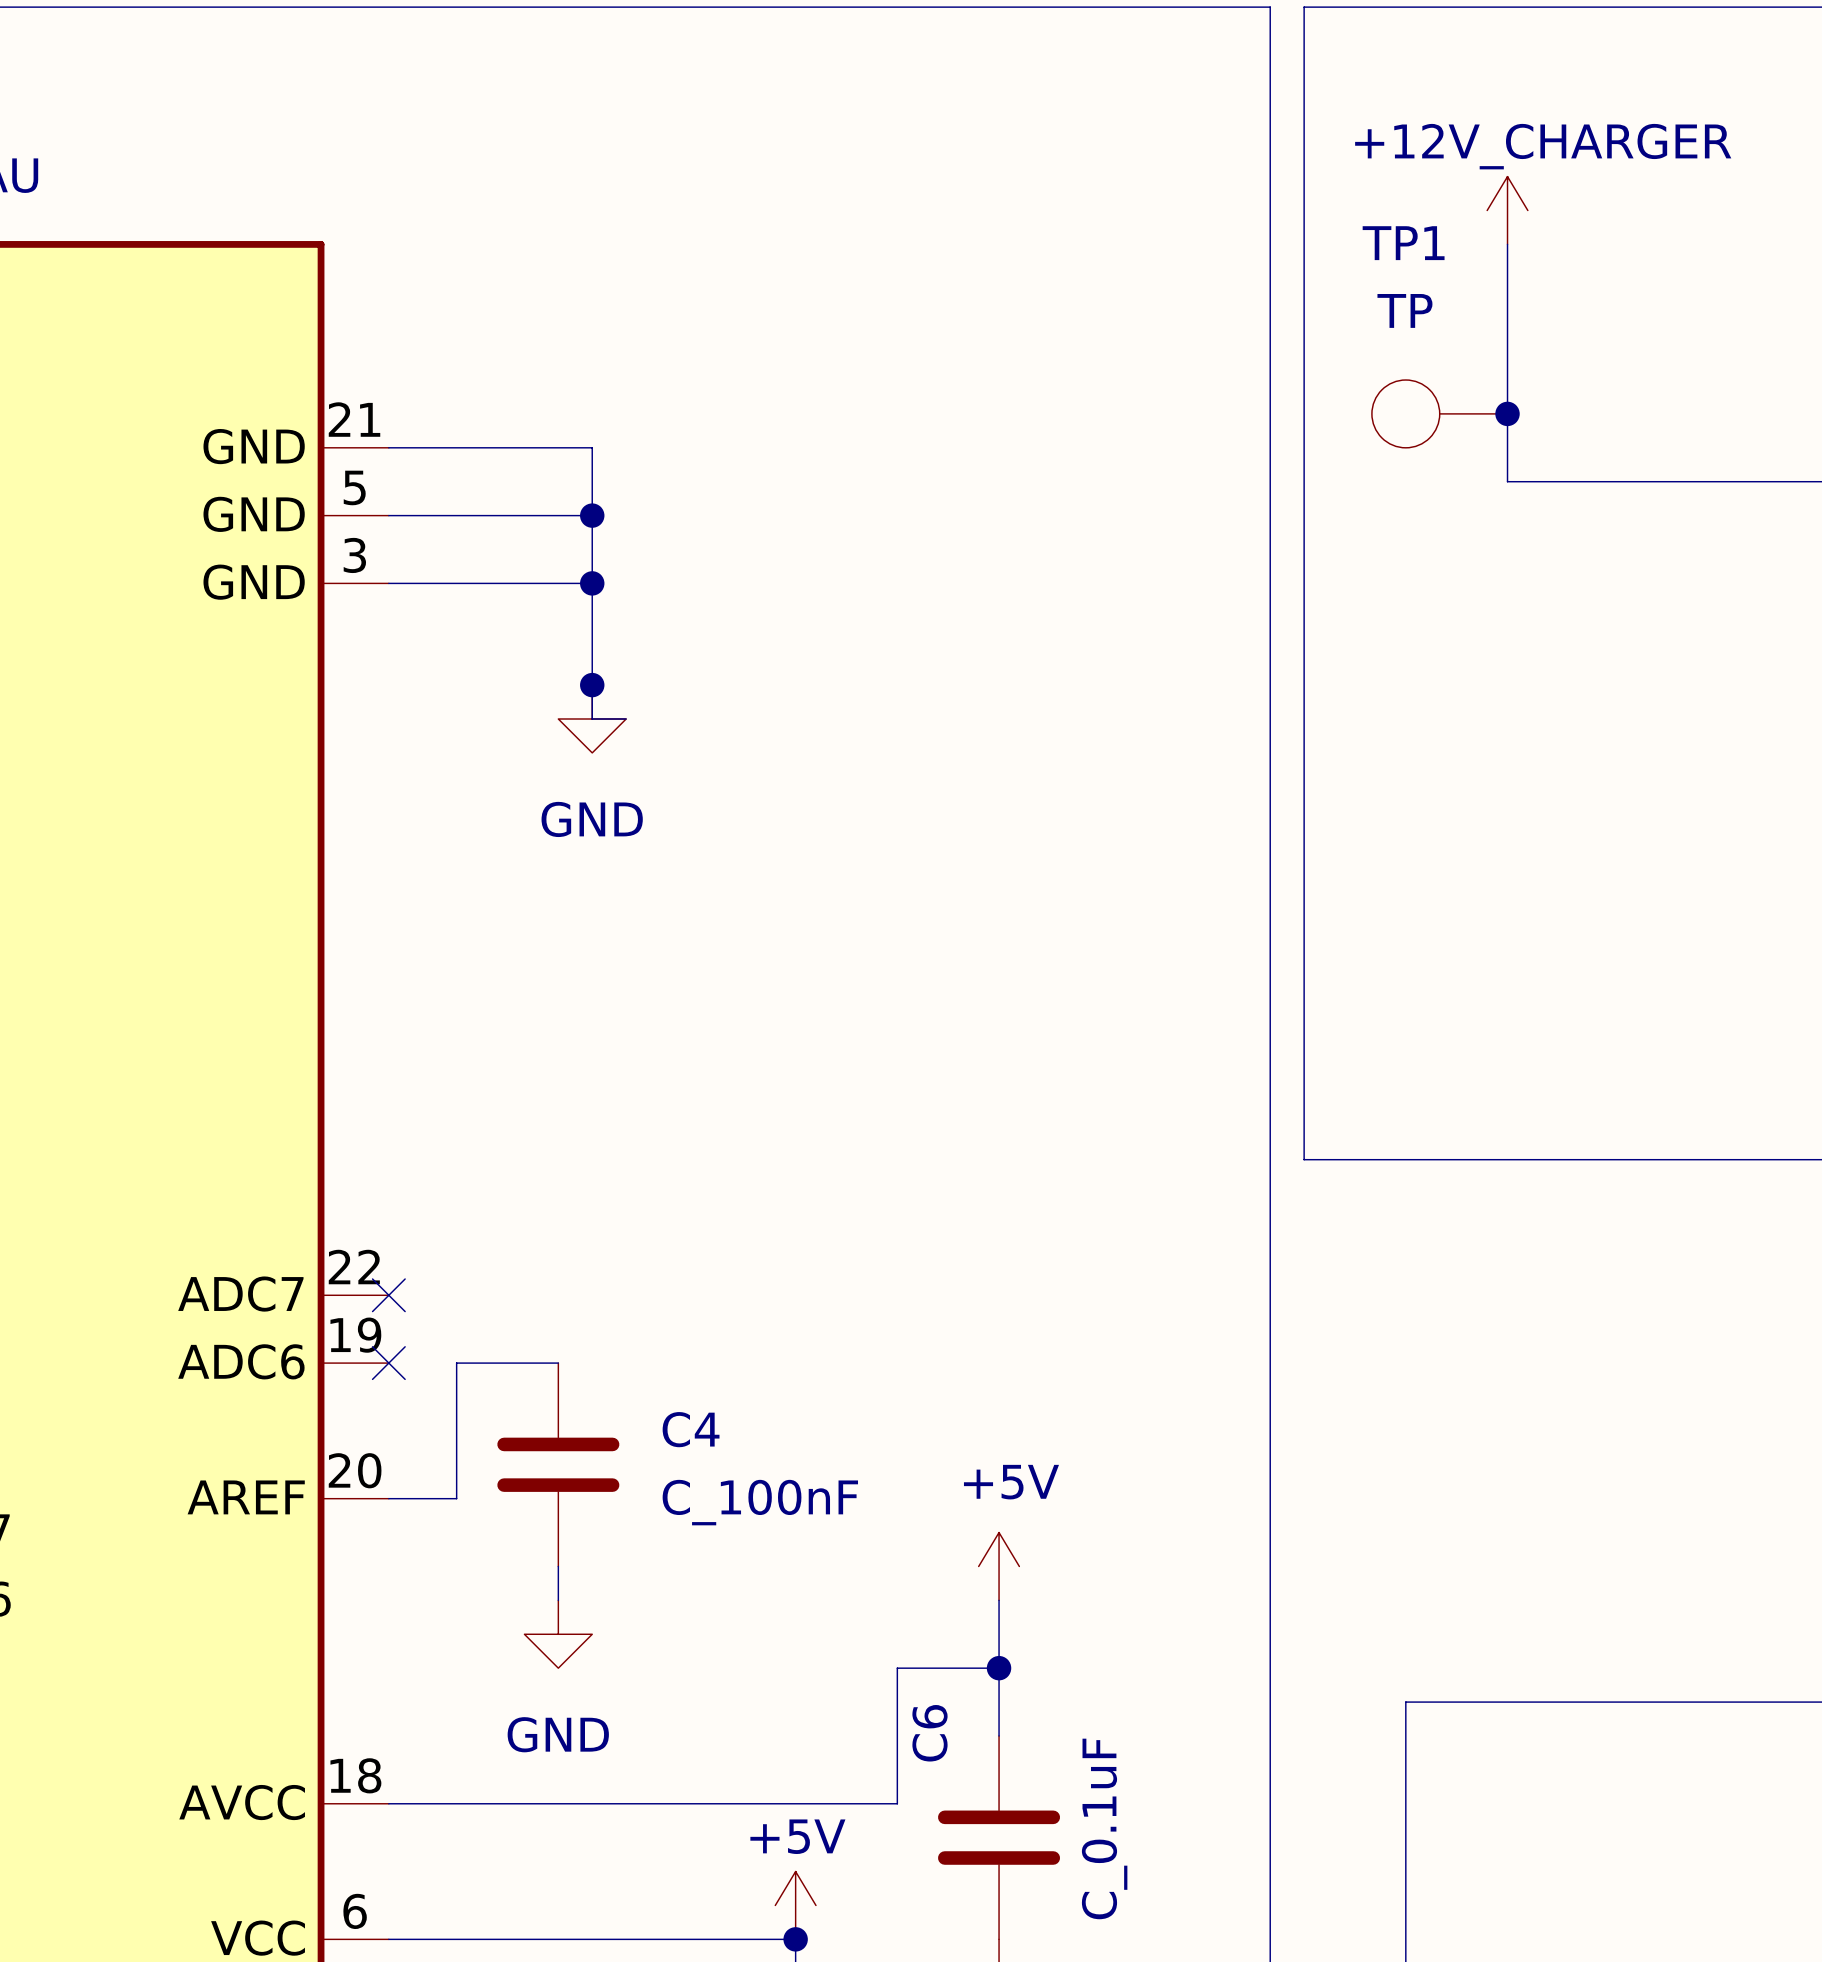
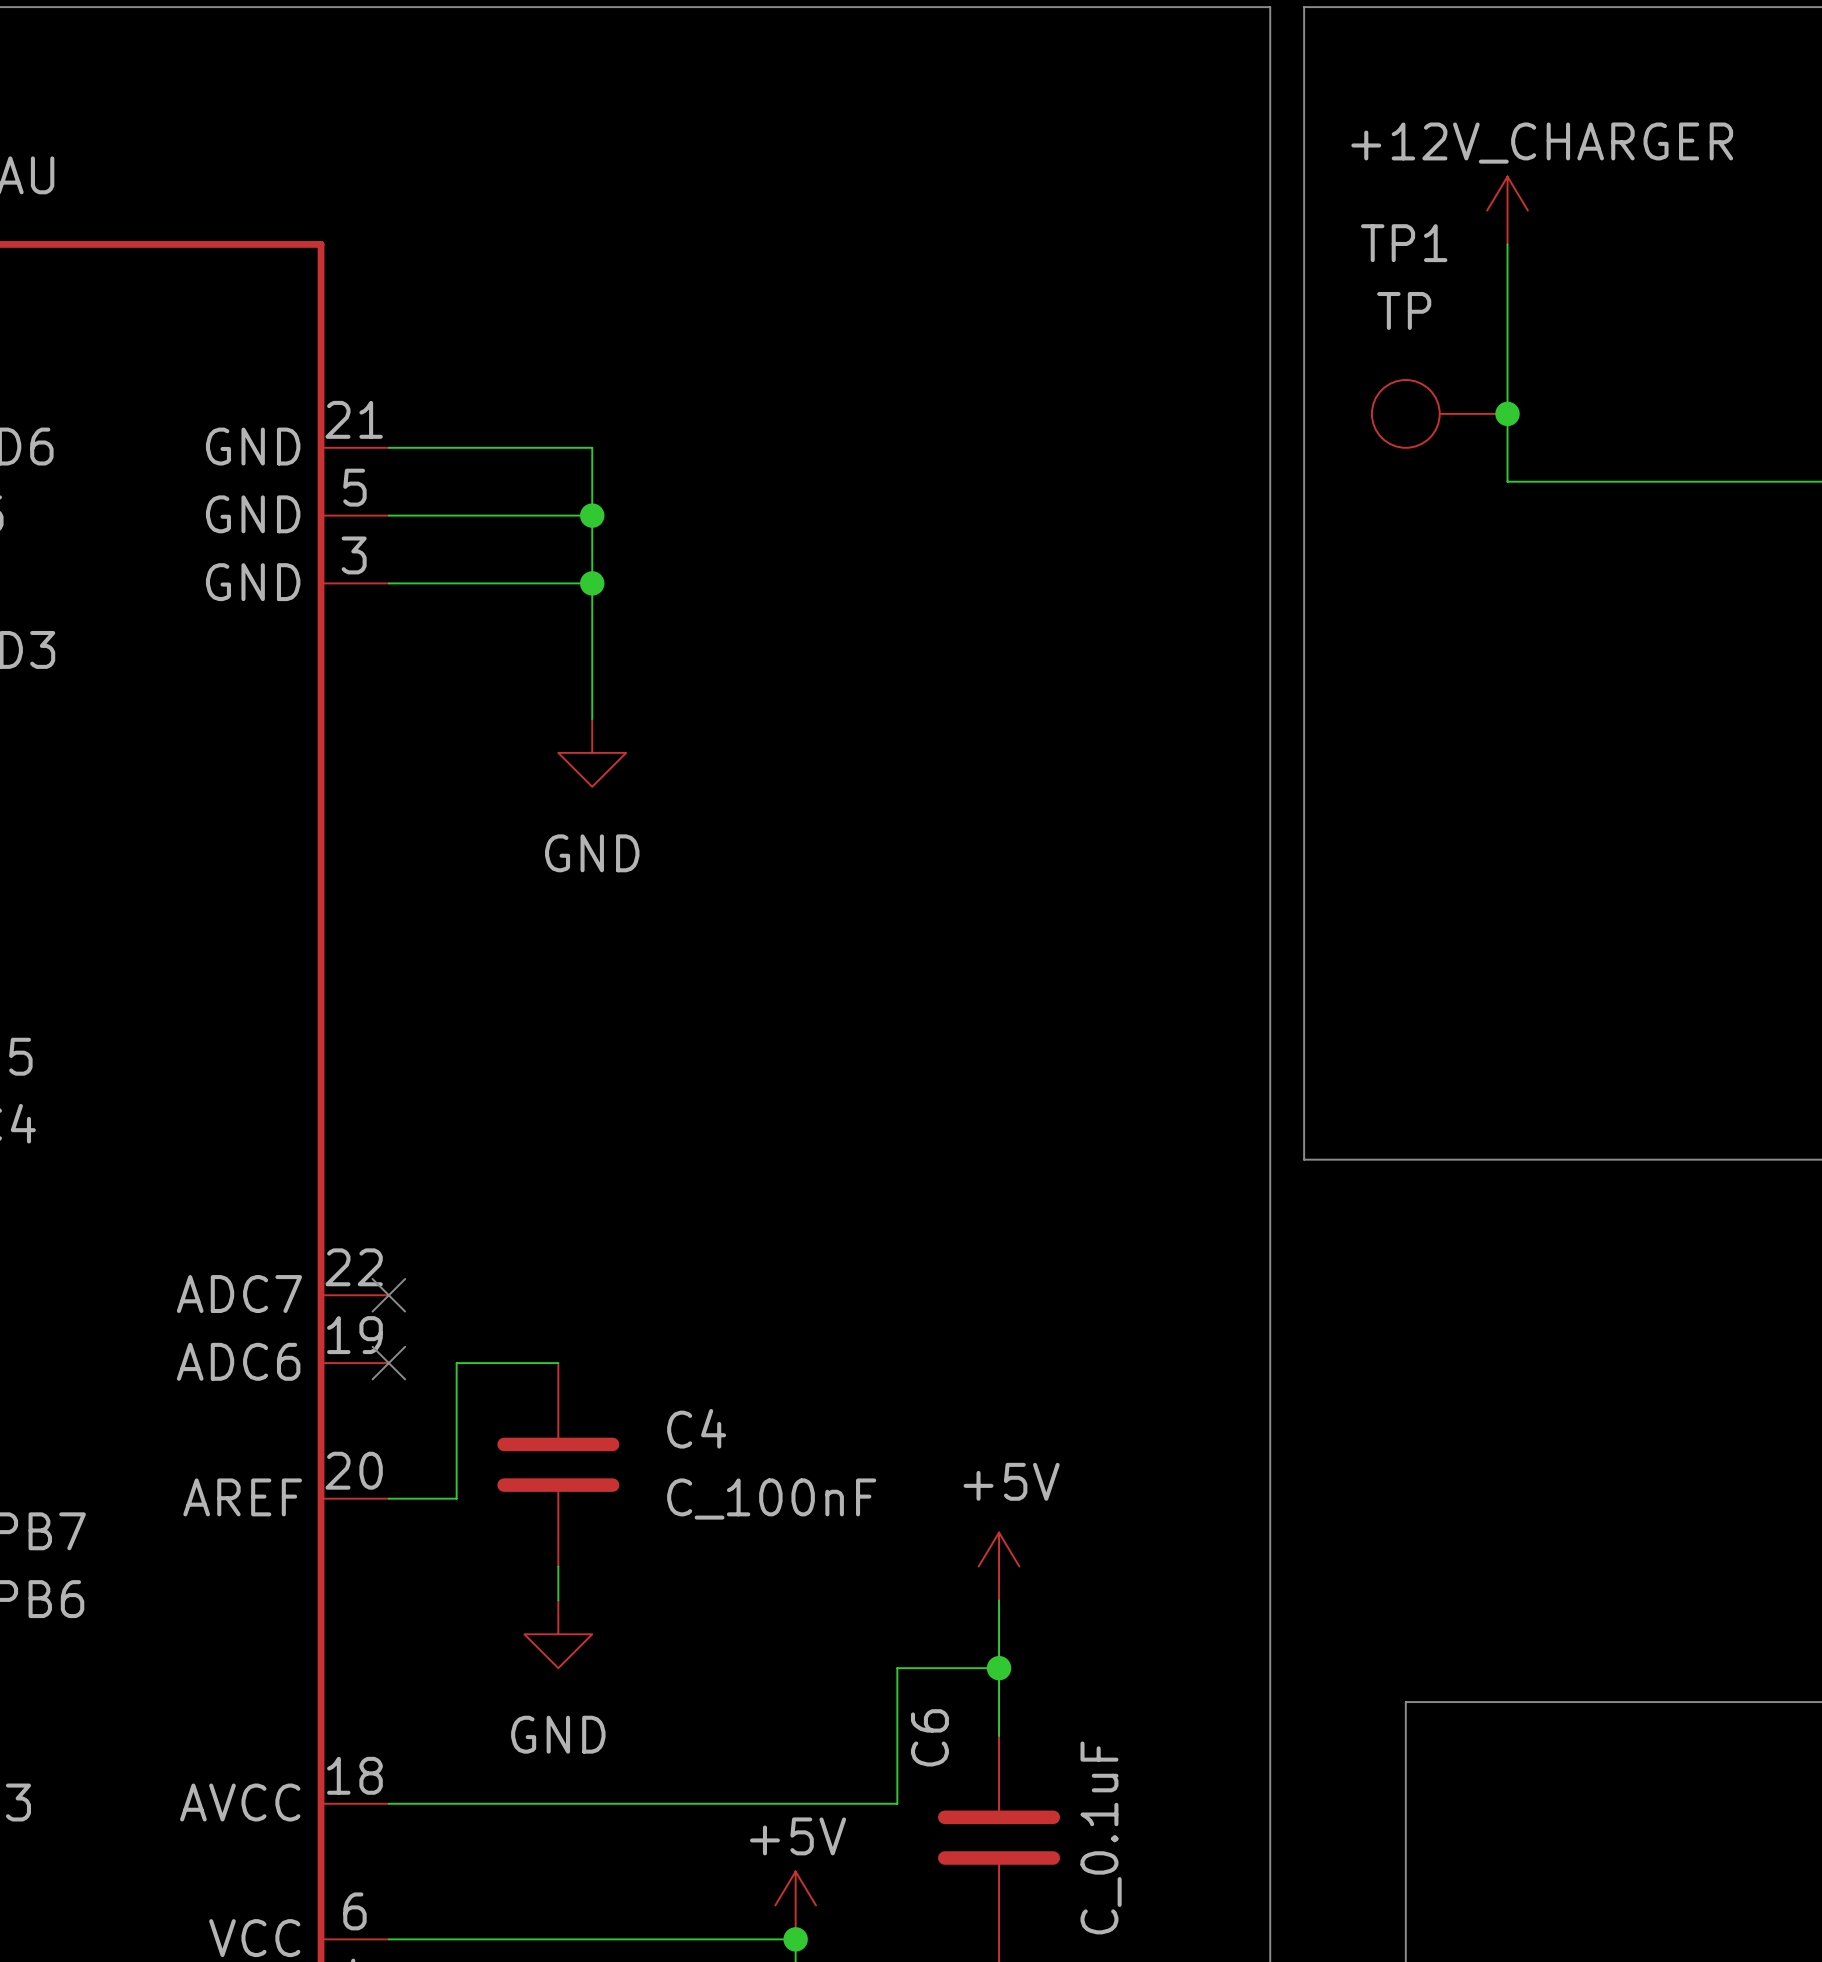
junction: (592, 685) -> none
wire: (592, 719) (626, 719) -> none
power symbol position: GND (592, 719) -> GND (592, 752)

